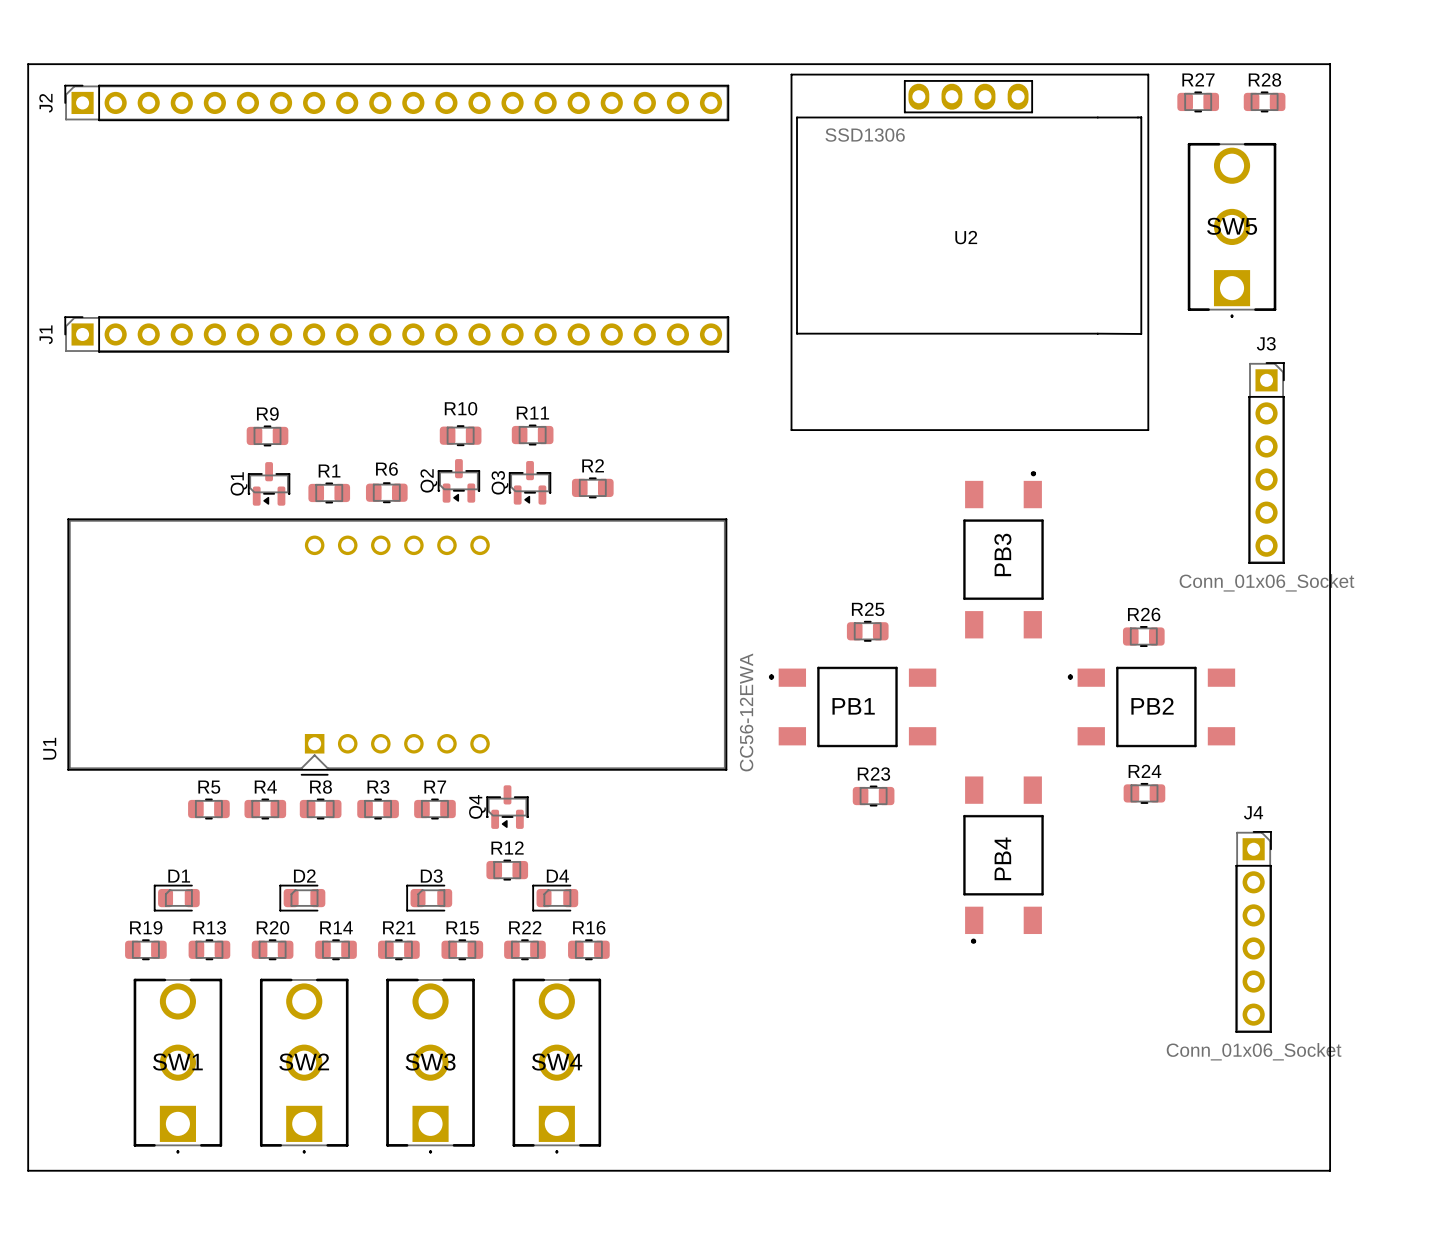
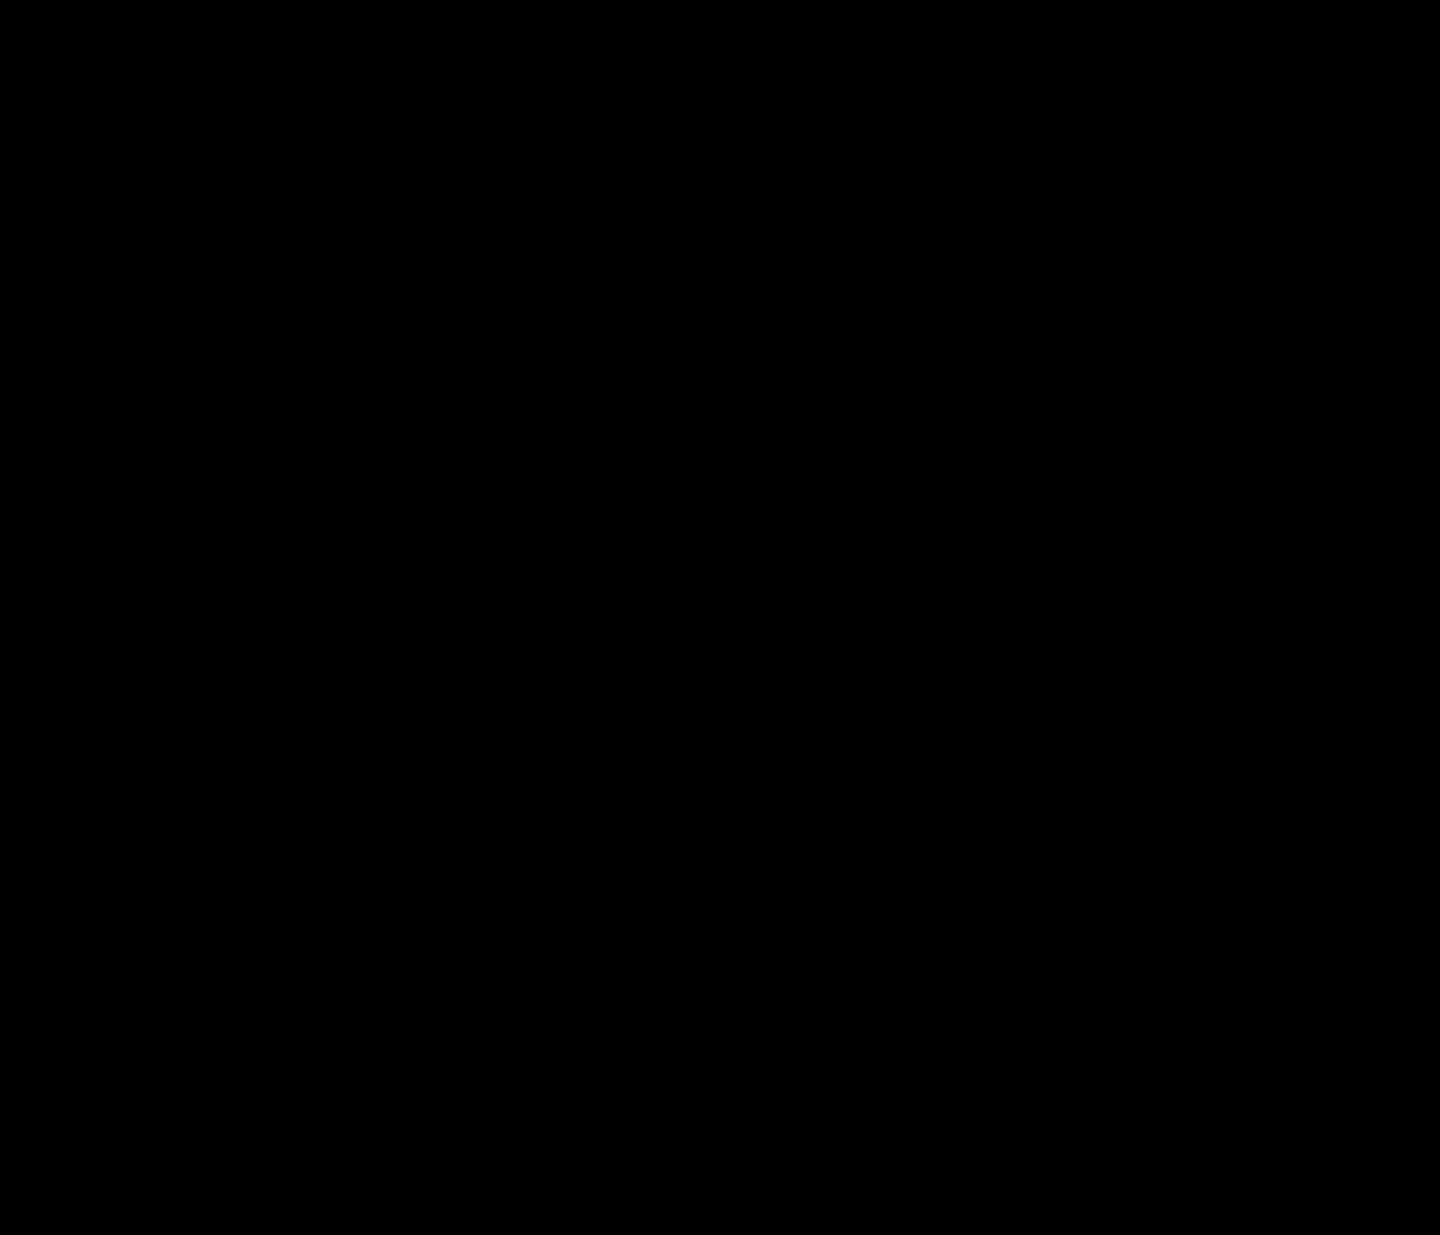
board edge: (28, 64) (1330, 64) (1330, 1170) (28, 1170) (28, 64) -> none
R27: (1198, 101) -> none
R28: (1264, 101) -> none
J2: (396, 102) -> none
SW5: (1232, 230) -> none
U2: SSD1306 (969, 252) -> none
J1: (396, 334) -> none
R9: (267, 435) -> none
R10: (460, 435) -> none
R11: (532, 435) -> none
J3: Conn_01x06_Socket (1266, 463) -> none
Q2: (458, 480) -> none
Q3: (530, 482) -> none
Q1: (269, 483) -> none
R2: (592, 487) -> none
R1: (329, 492) -> none
R6: (386, 492) -> none
PB3: (1003, 554) -> none
R25: (867, 631) -> none
R26: (1143, 636) -> none
U1: CC56-12EWA (397, 647) -> none
PB1: (852, 706) -> none
PB2: (1151, 706) -> none
R24: (1144, 793) -> none
R23: (873, 796) -> none
Q4: (507, 807) -> none
R5: (208, 809) -> none
R4: (265, 809) -> none
R8: (320, 809) -> none
R3: (378, 809) -> none
R7: (434, 809) -> none
PB4: (1003, 860) -> none
R12: (507, 870) -> none
D1: (176, 898) -> none
D2: (302, 898) -> none
D3: (429, 898) -> none
D4: (555, 898) -> none
J4: Conn_01x06_Socket (1253, 931) -> none
R19: (145, 949) -> none
R13: (209, 949) -> none
R20: (272, 949) -> none
R14: (336, 949) -> none
R21: (398, 949) -> none
R15: (462, 949) -> none
R22: (524, 949) -> none
R16: (588, 949) -> none
SW1: (177, 1065) -> none
SW2: (304, 1065) -> none
SW3: (430, 1065) -> none
SW4: (556, 1065) -> none

